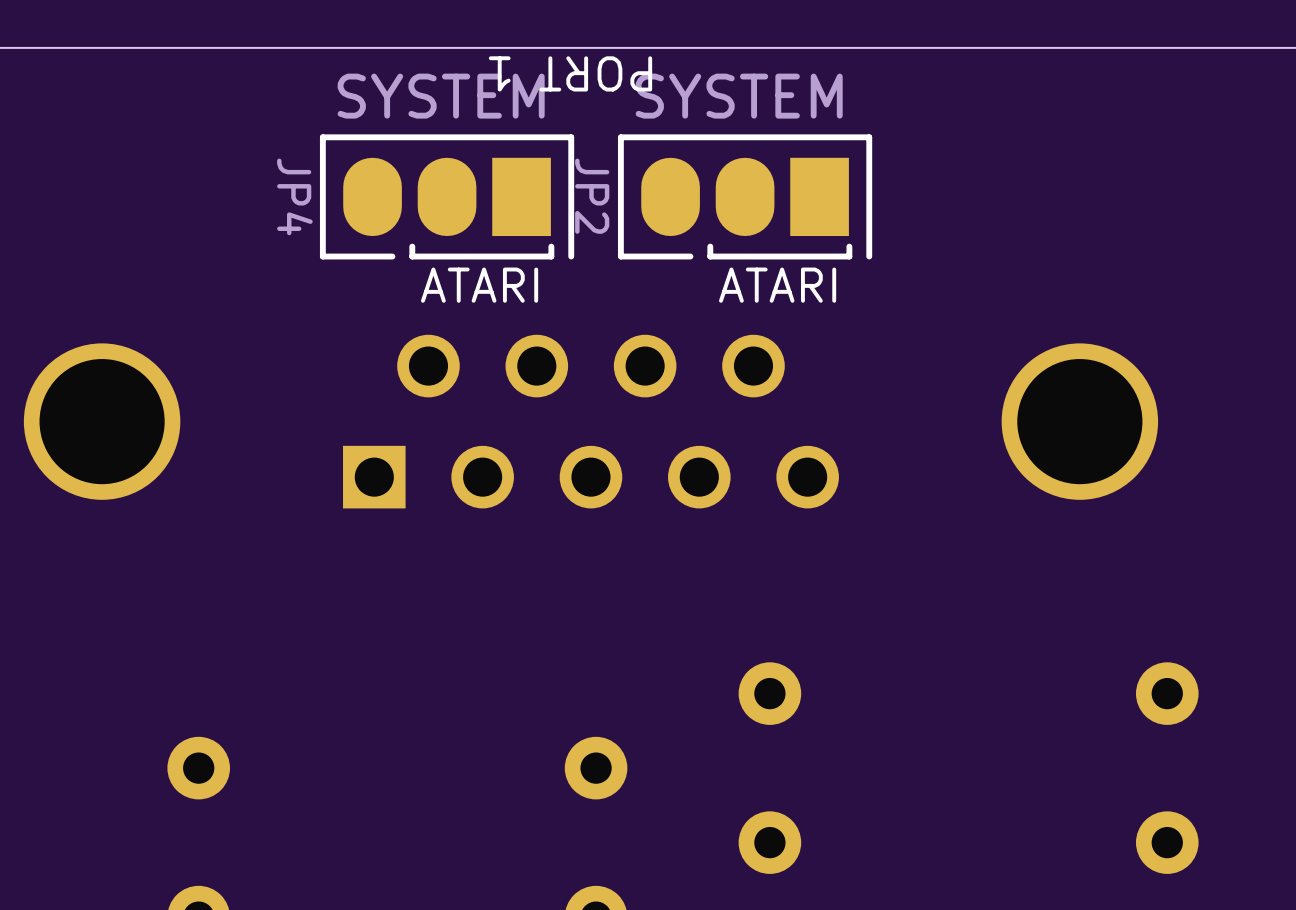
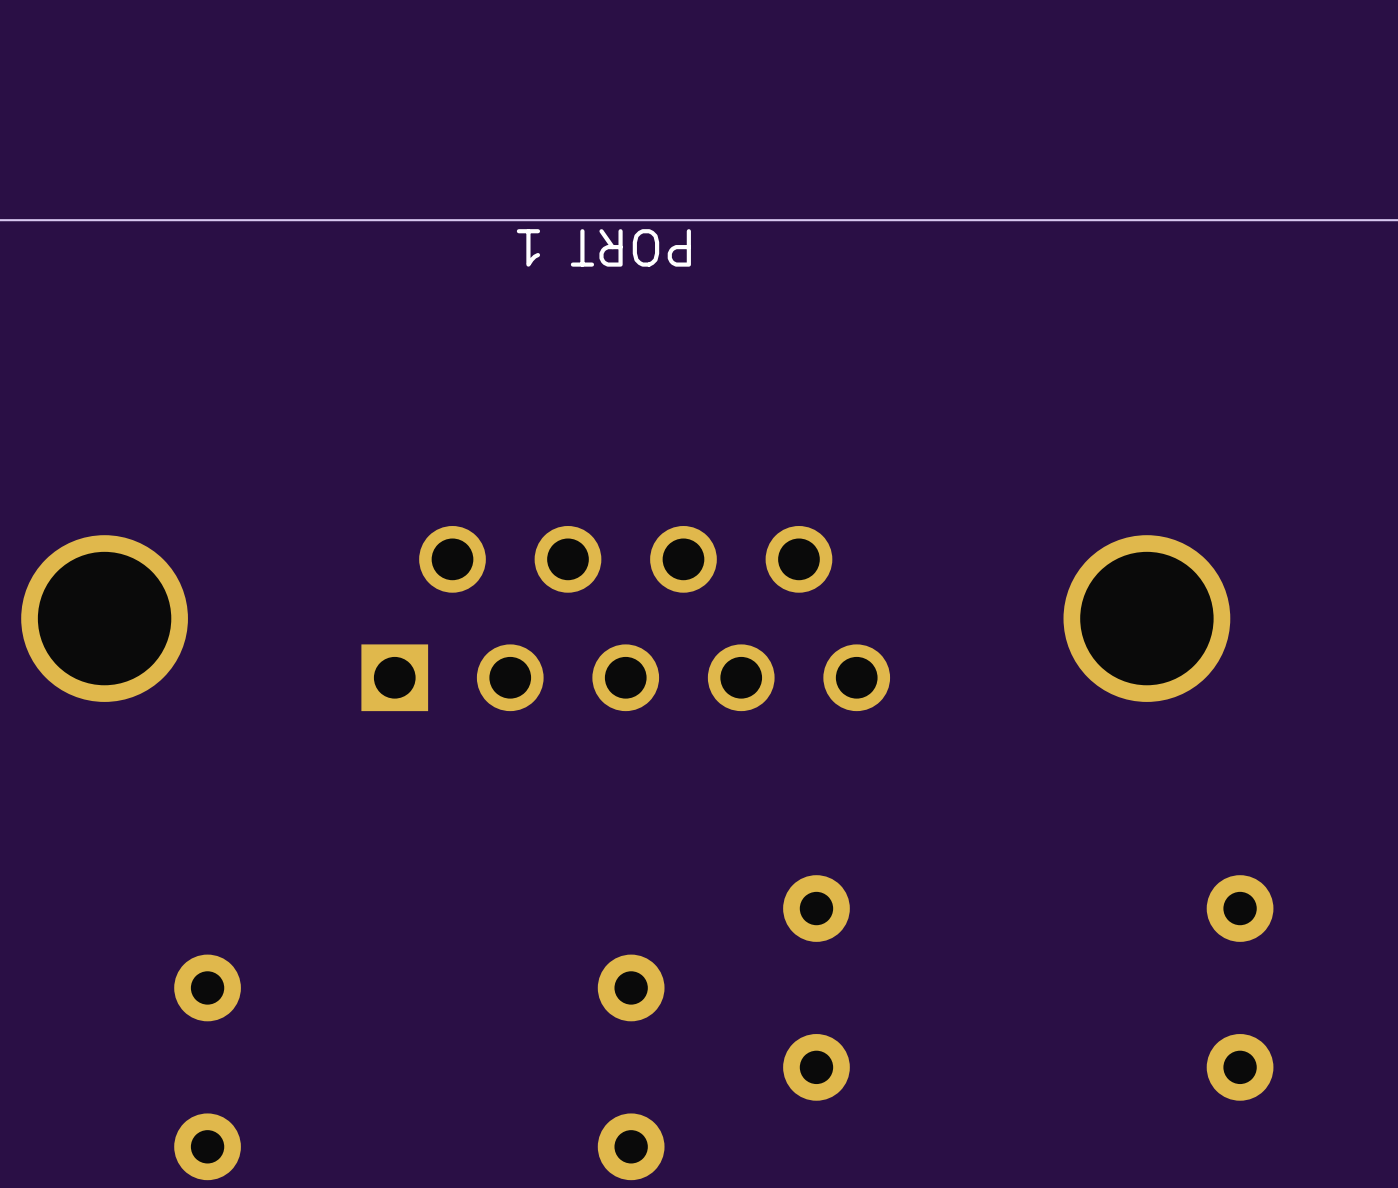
JP4: SYSTEM (447, 196) -> none
JP2: SYSTEM (745, 196) -> none
text: ATARI (479, 285) -> none
text: ATARI (777, 285) -> none

